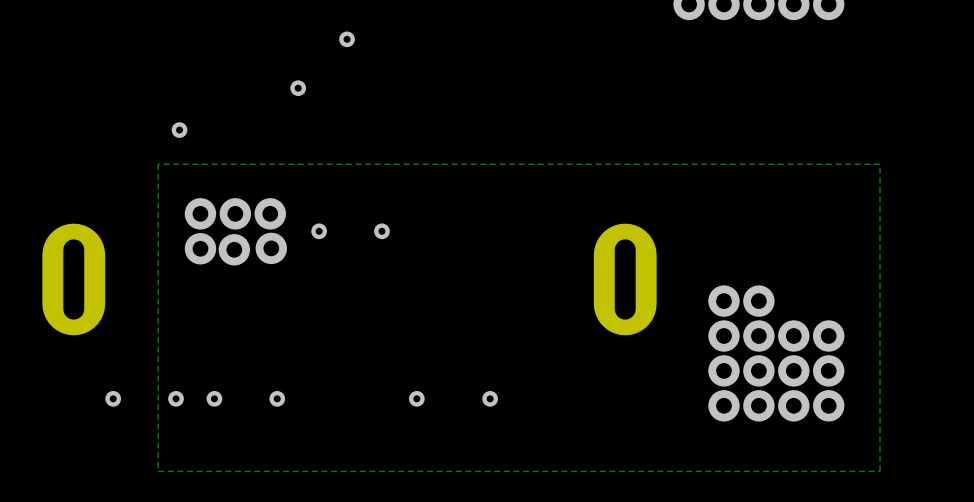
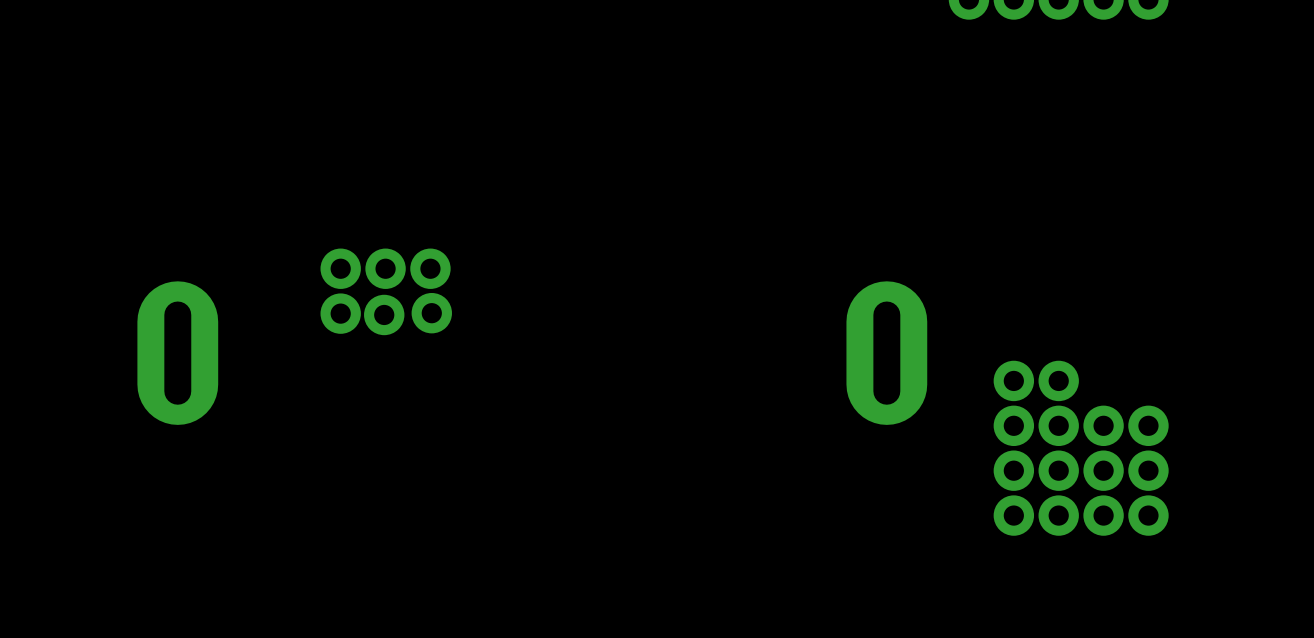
via: (347, 39) -> none
via: (298, 88) -> none
via: (179, 130) -> none
zone outline: (880, 164) (880, 471) (158, 471) (158, 164) (880, 164) -> none
via: (319, 231) -> none
via: (381, 231) -> none
via: (113, 398) -> none
via: (176, 398) -> none
via: (214, 398) -> none
via: (277, 398) -> none
via: (416, 398) -> none
via: (490, 398) -> none

